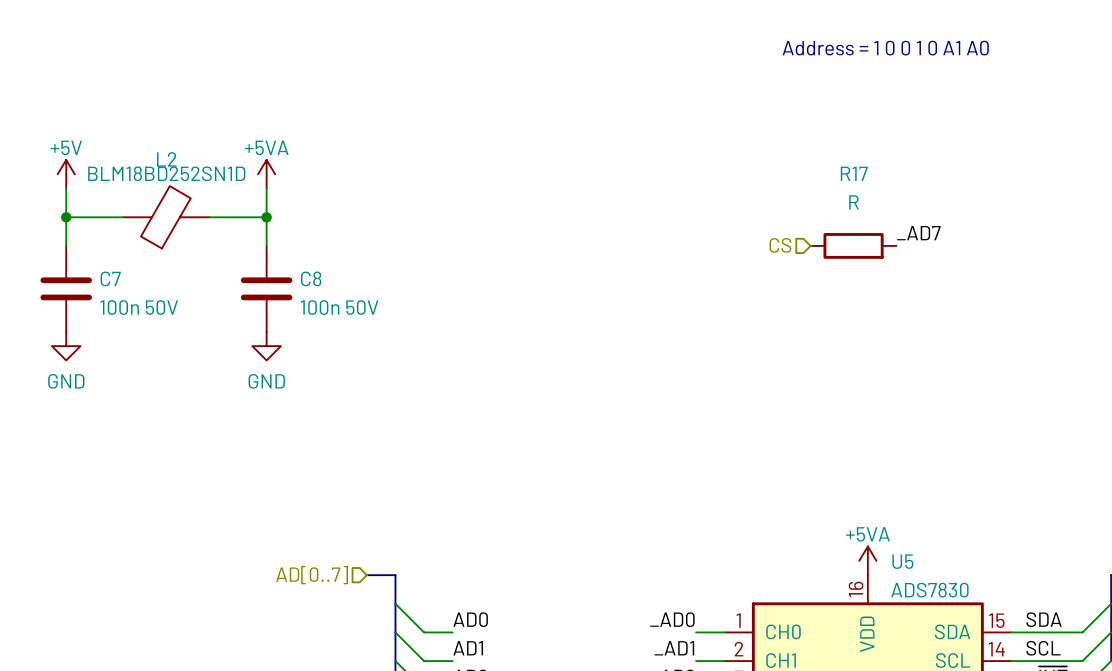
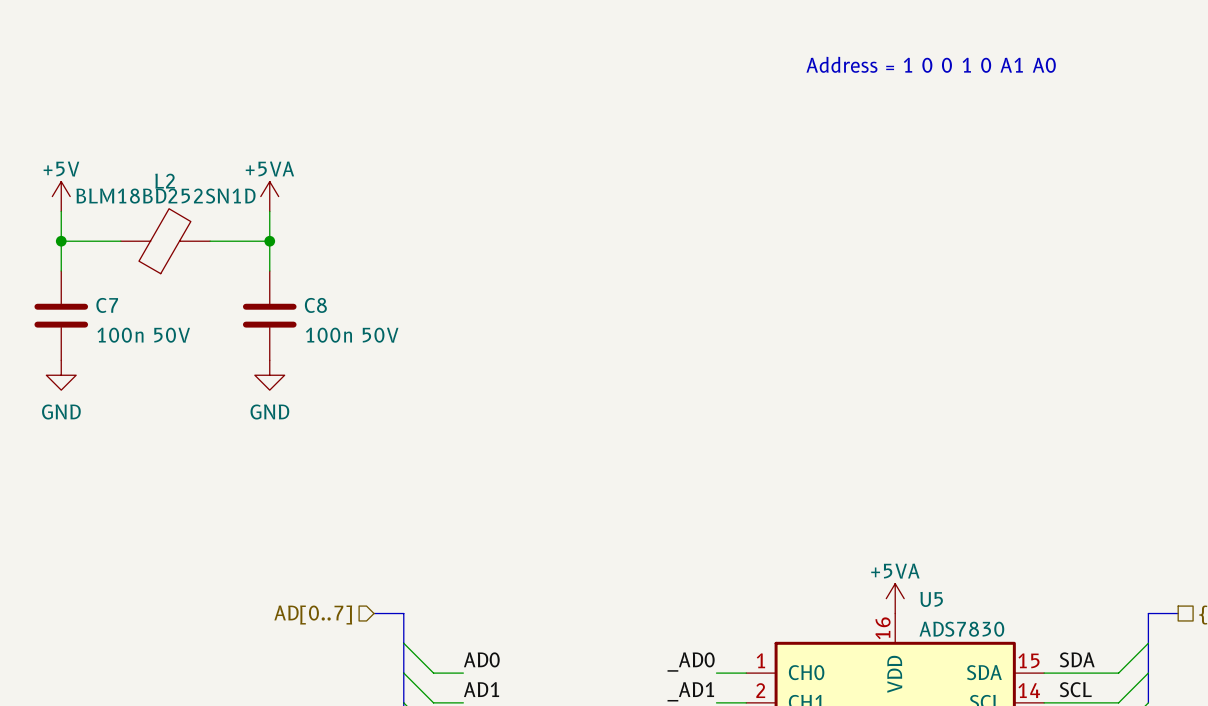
label: _AD7 (918, 233) -> none
hierarchical label: CS (780, 245) -> none
R17: R (853, 245) -> none

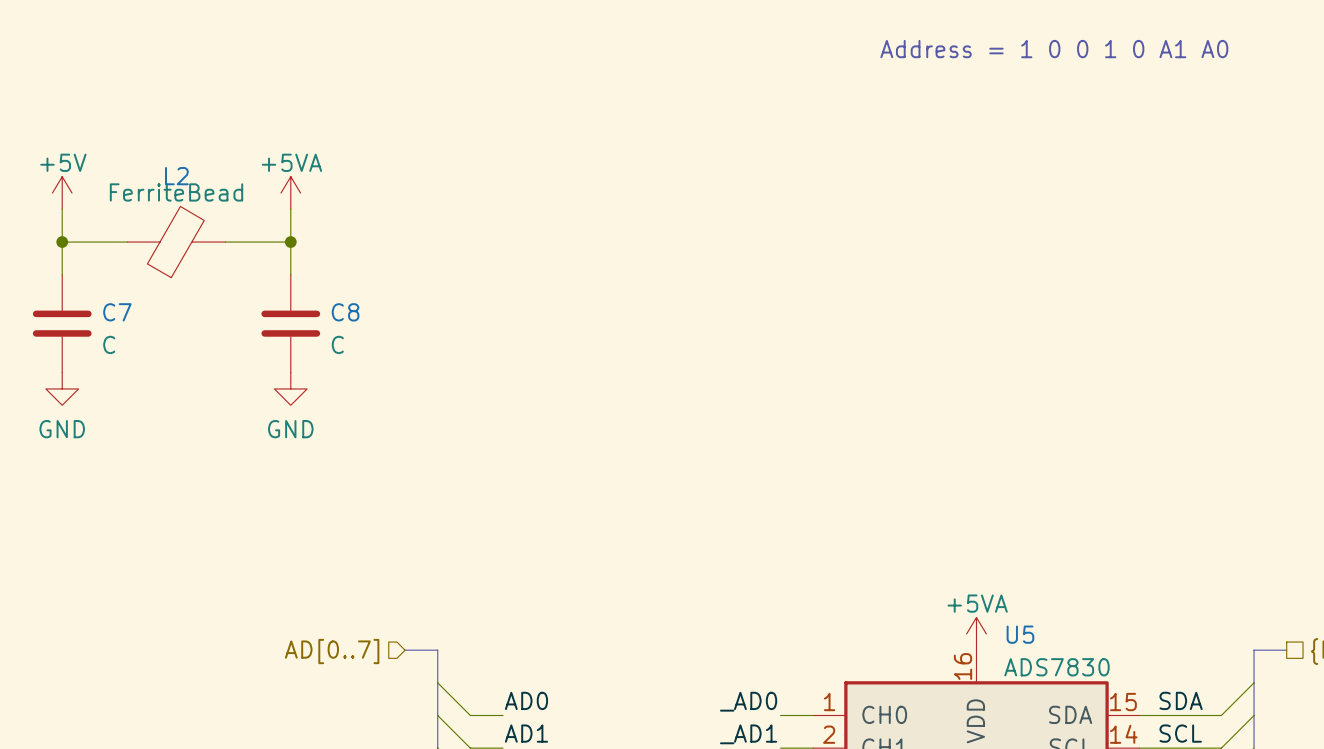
L2 value: BLM18BD252SN1D (165, 196) -> FerriteBead (176, 192)
C7 value: 100n 50V (143, 335) -> C (109, 344)
C8 value: 100n 50V (352, 335) -> C (337, 344)

